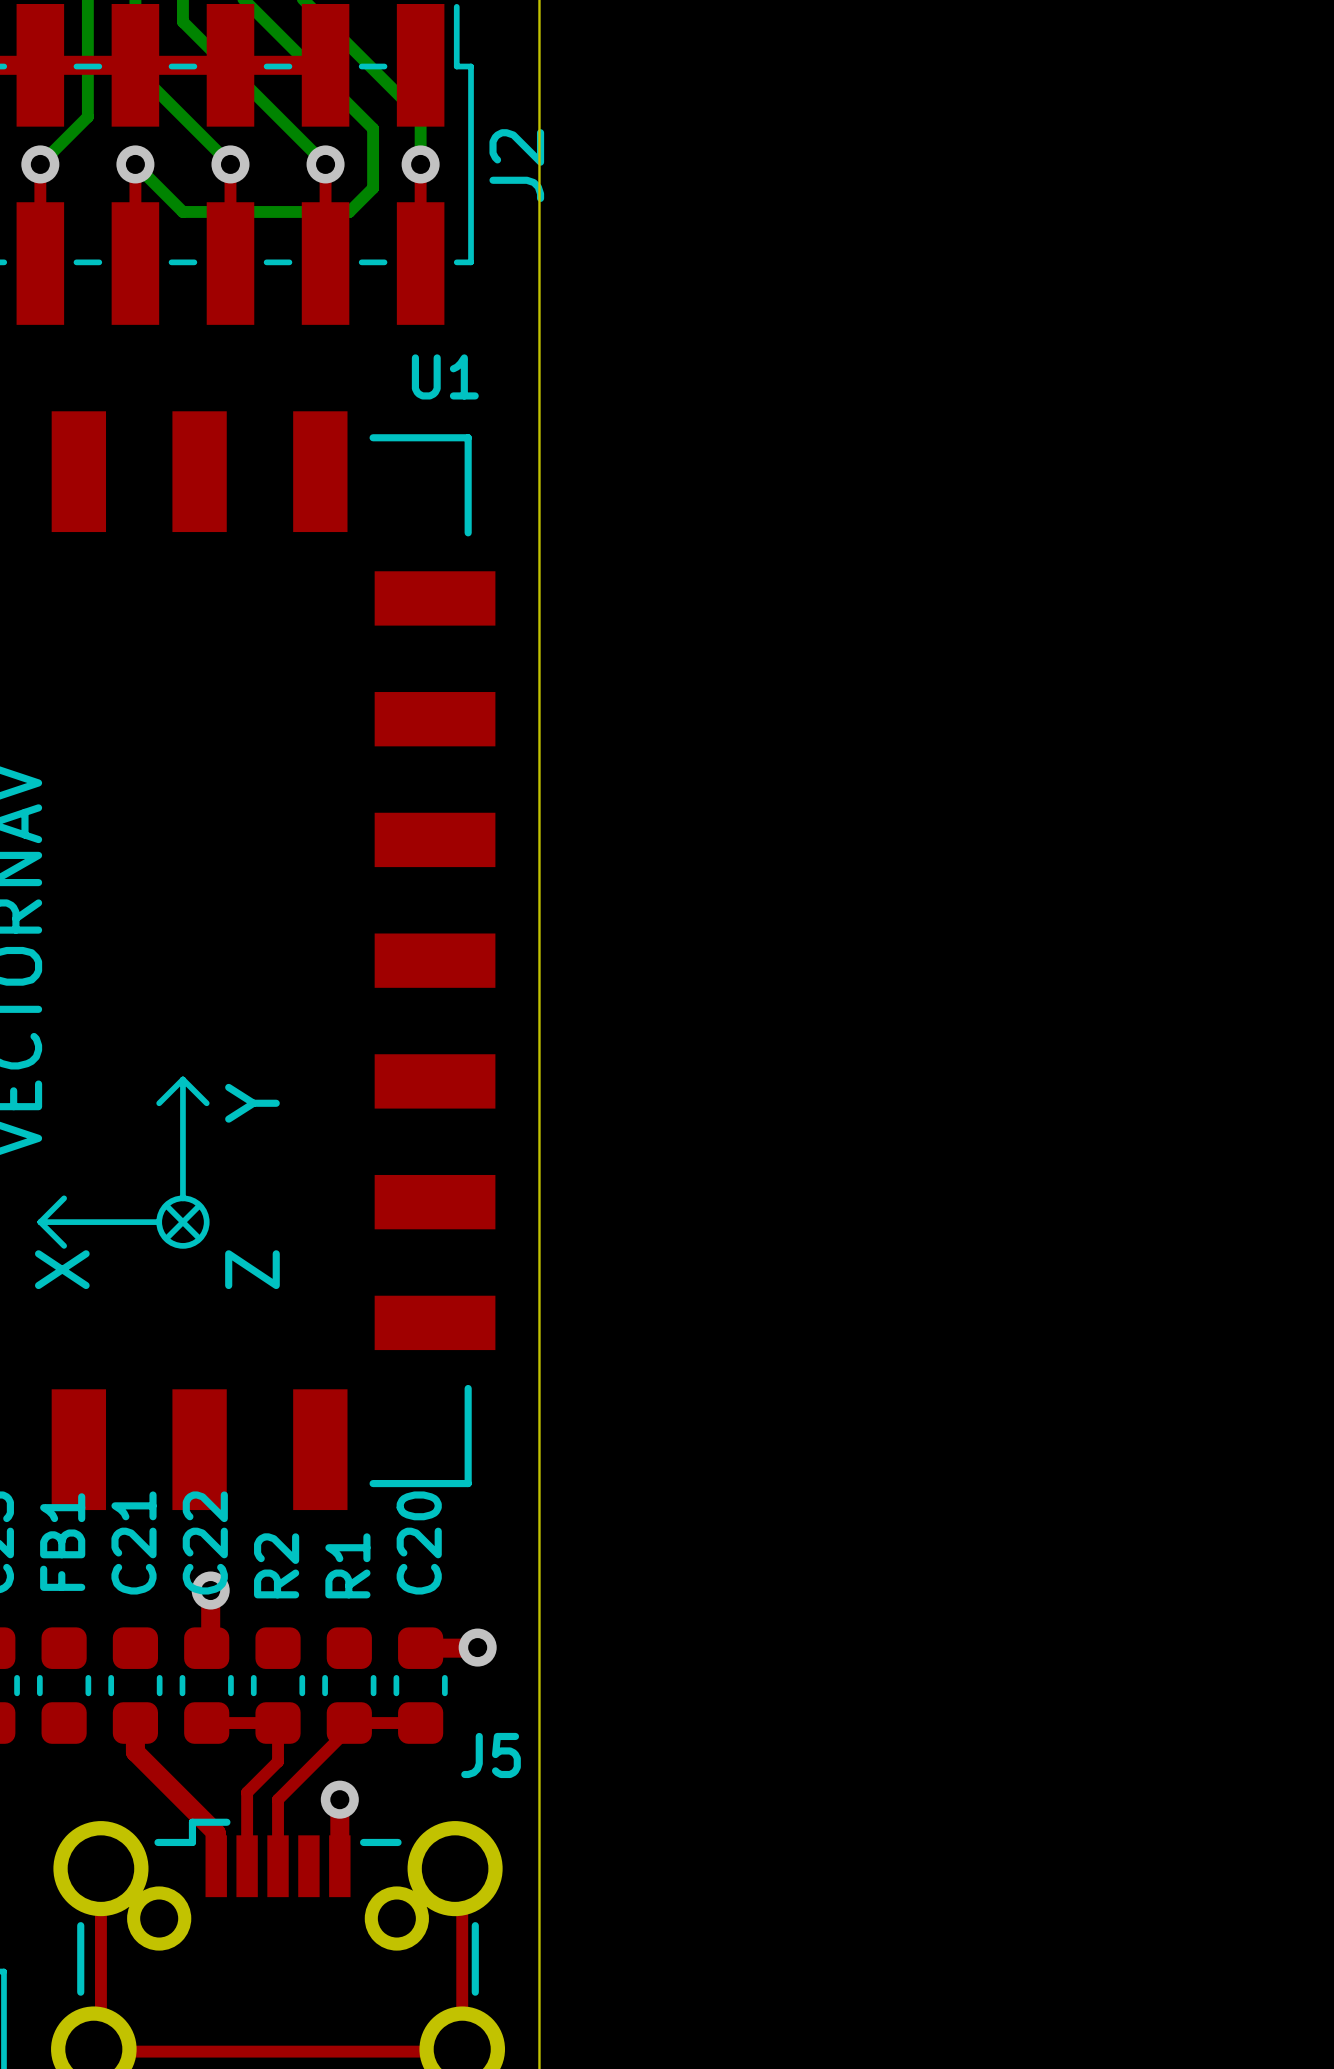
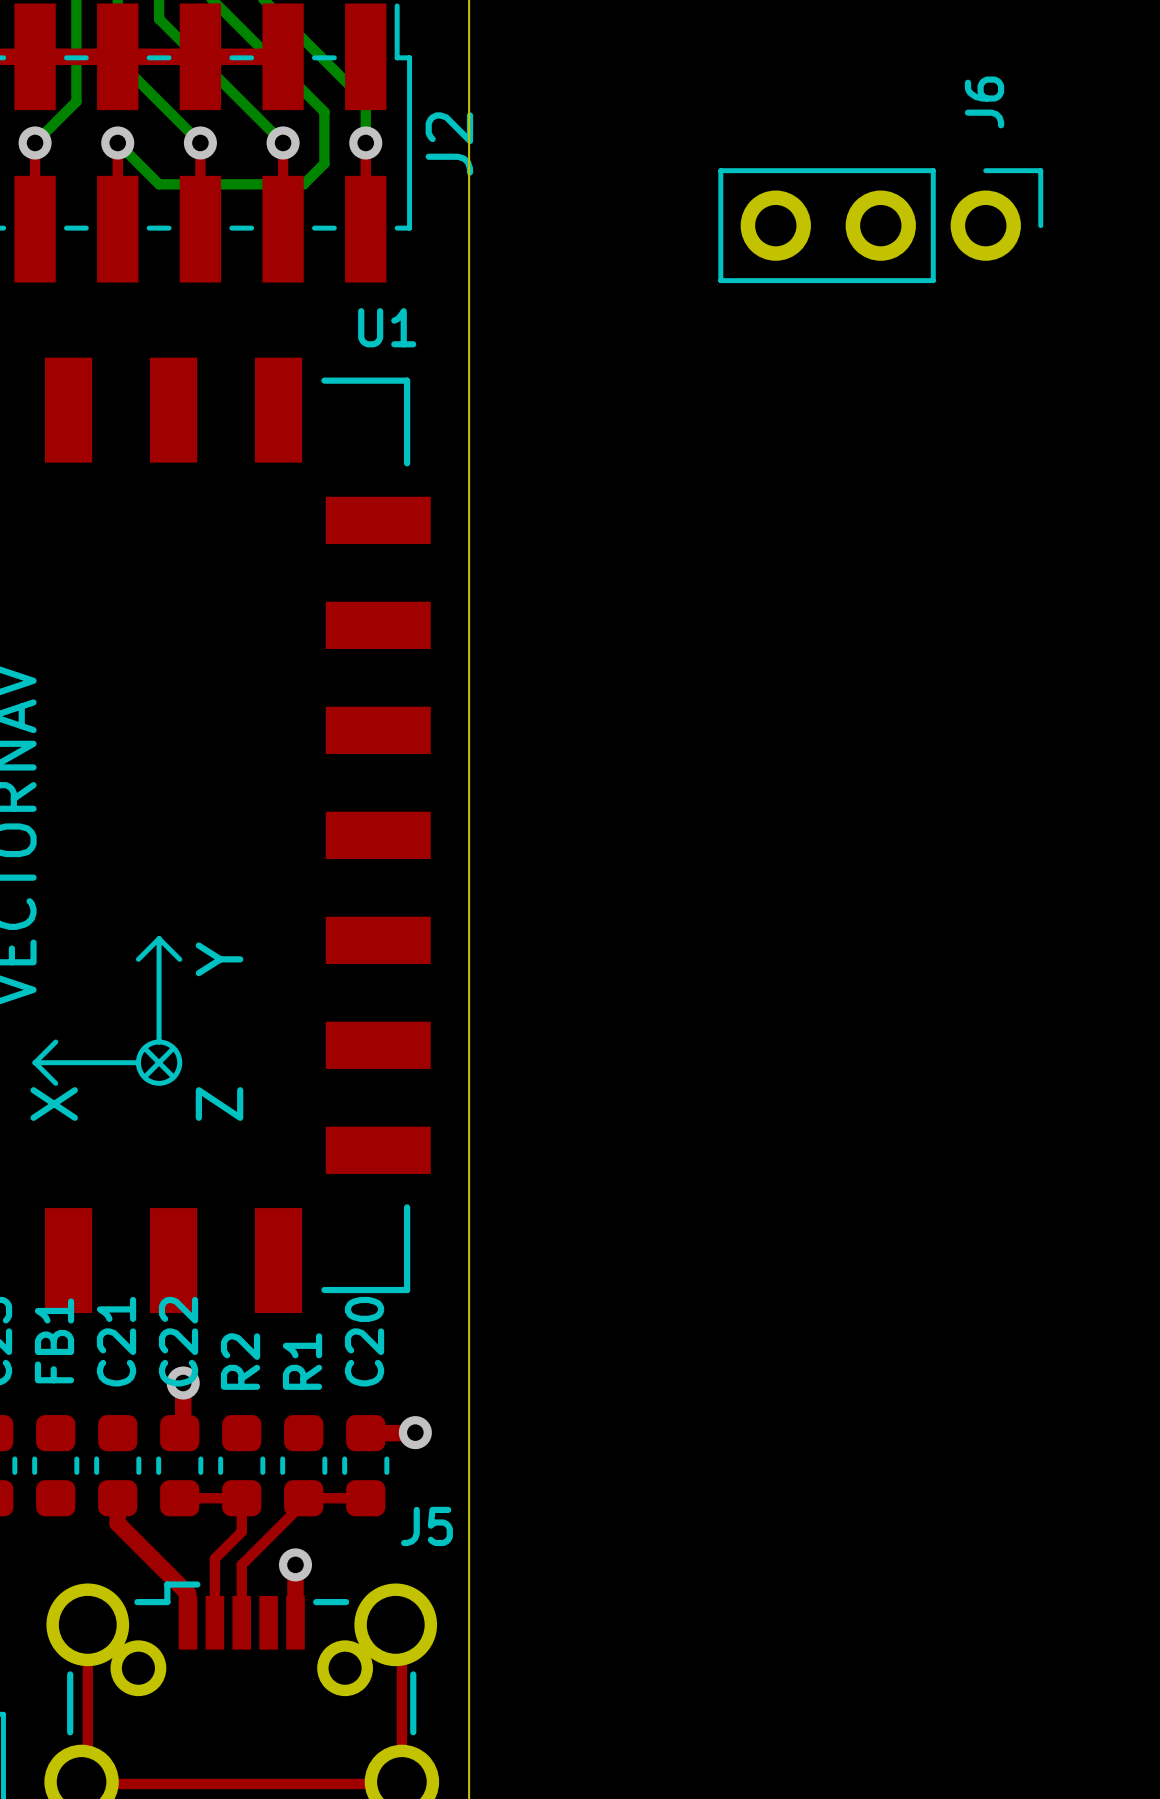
J6: none -> (880, 225)

